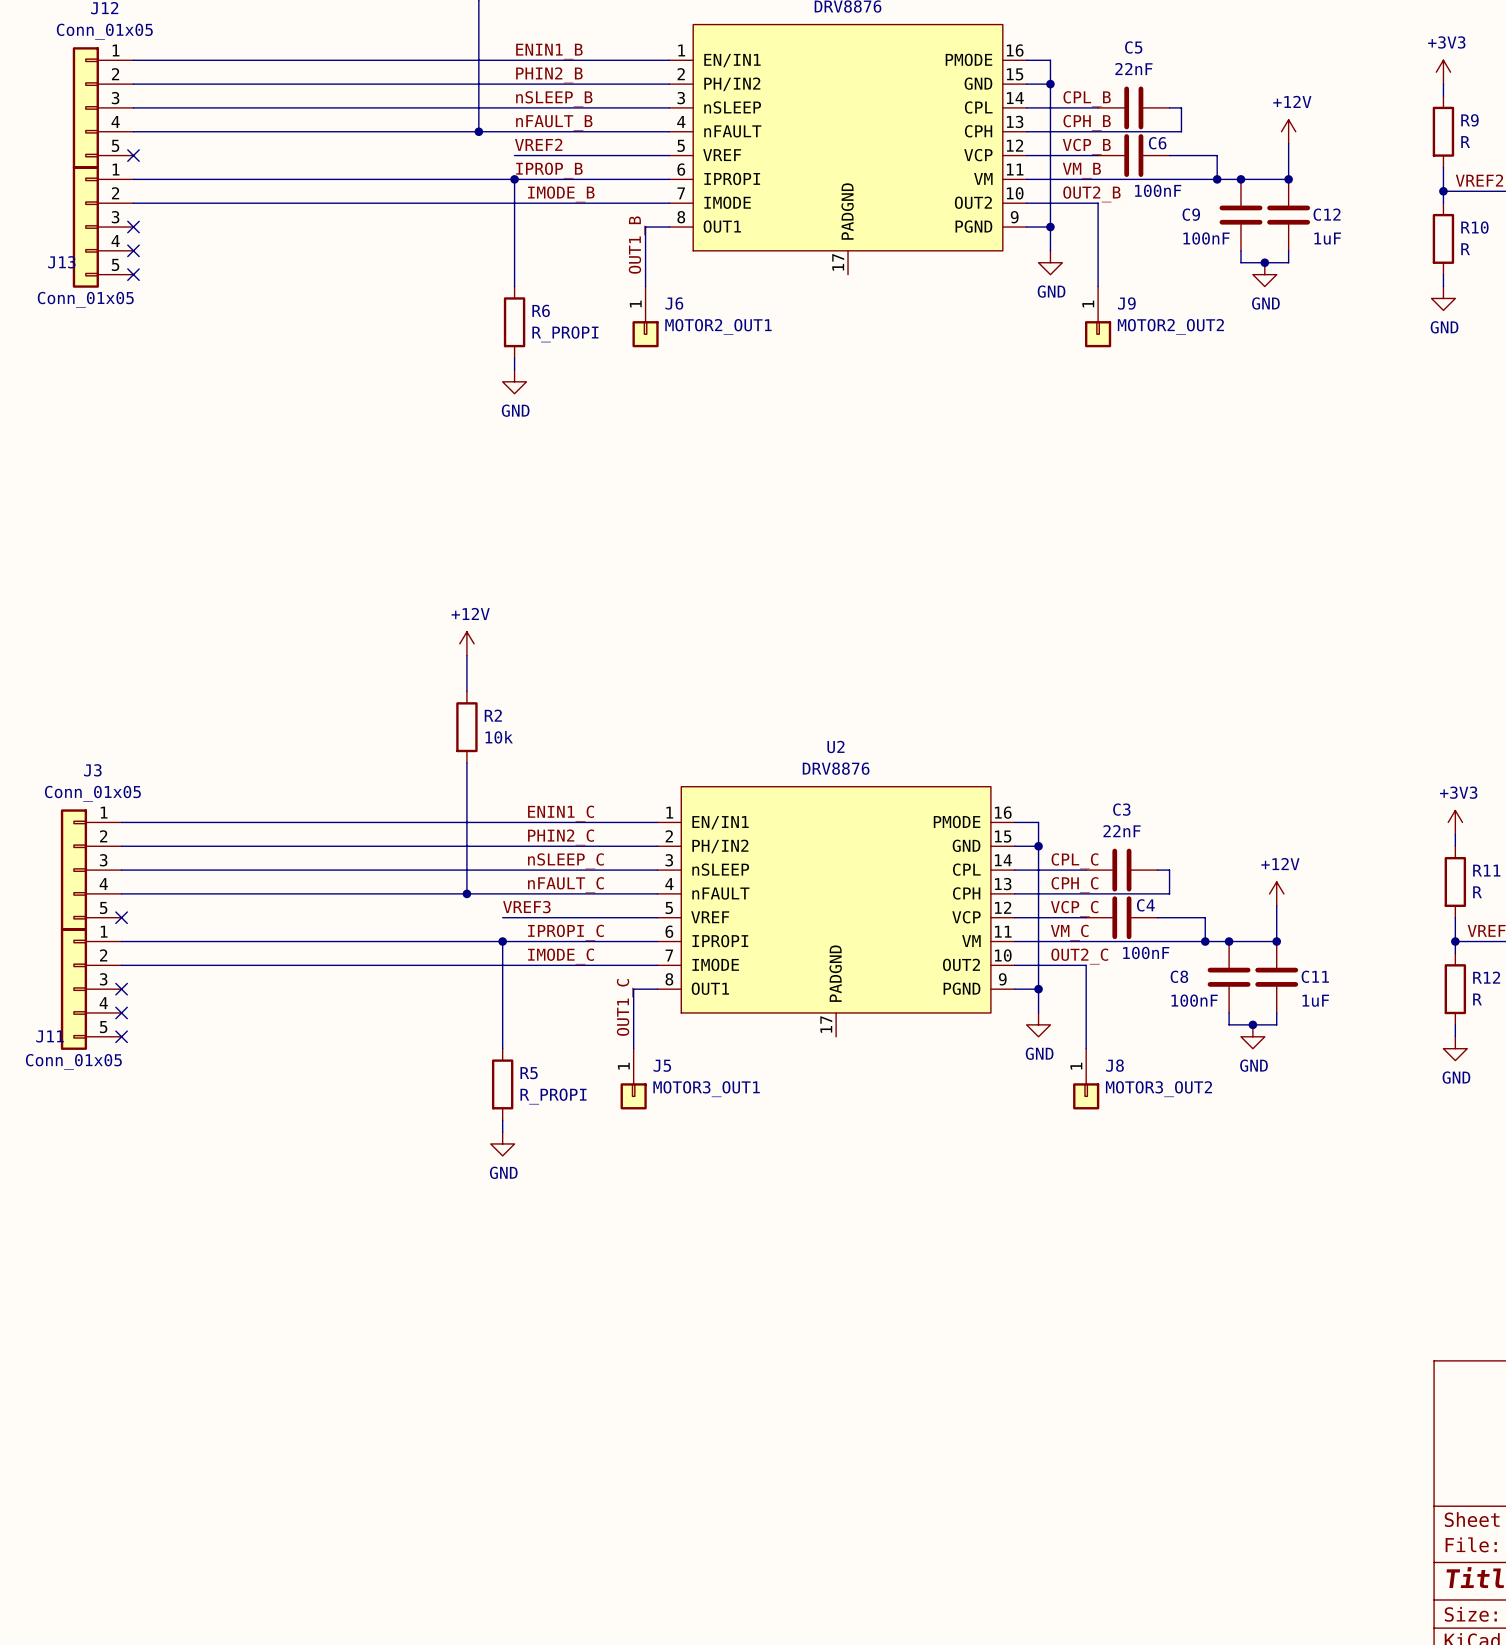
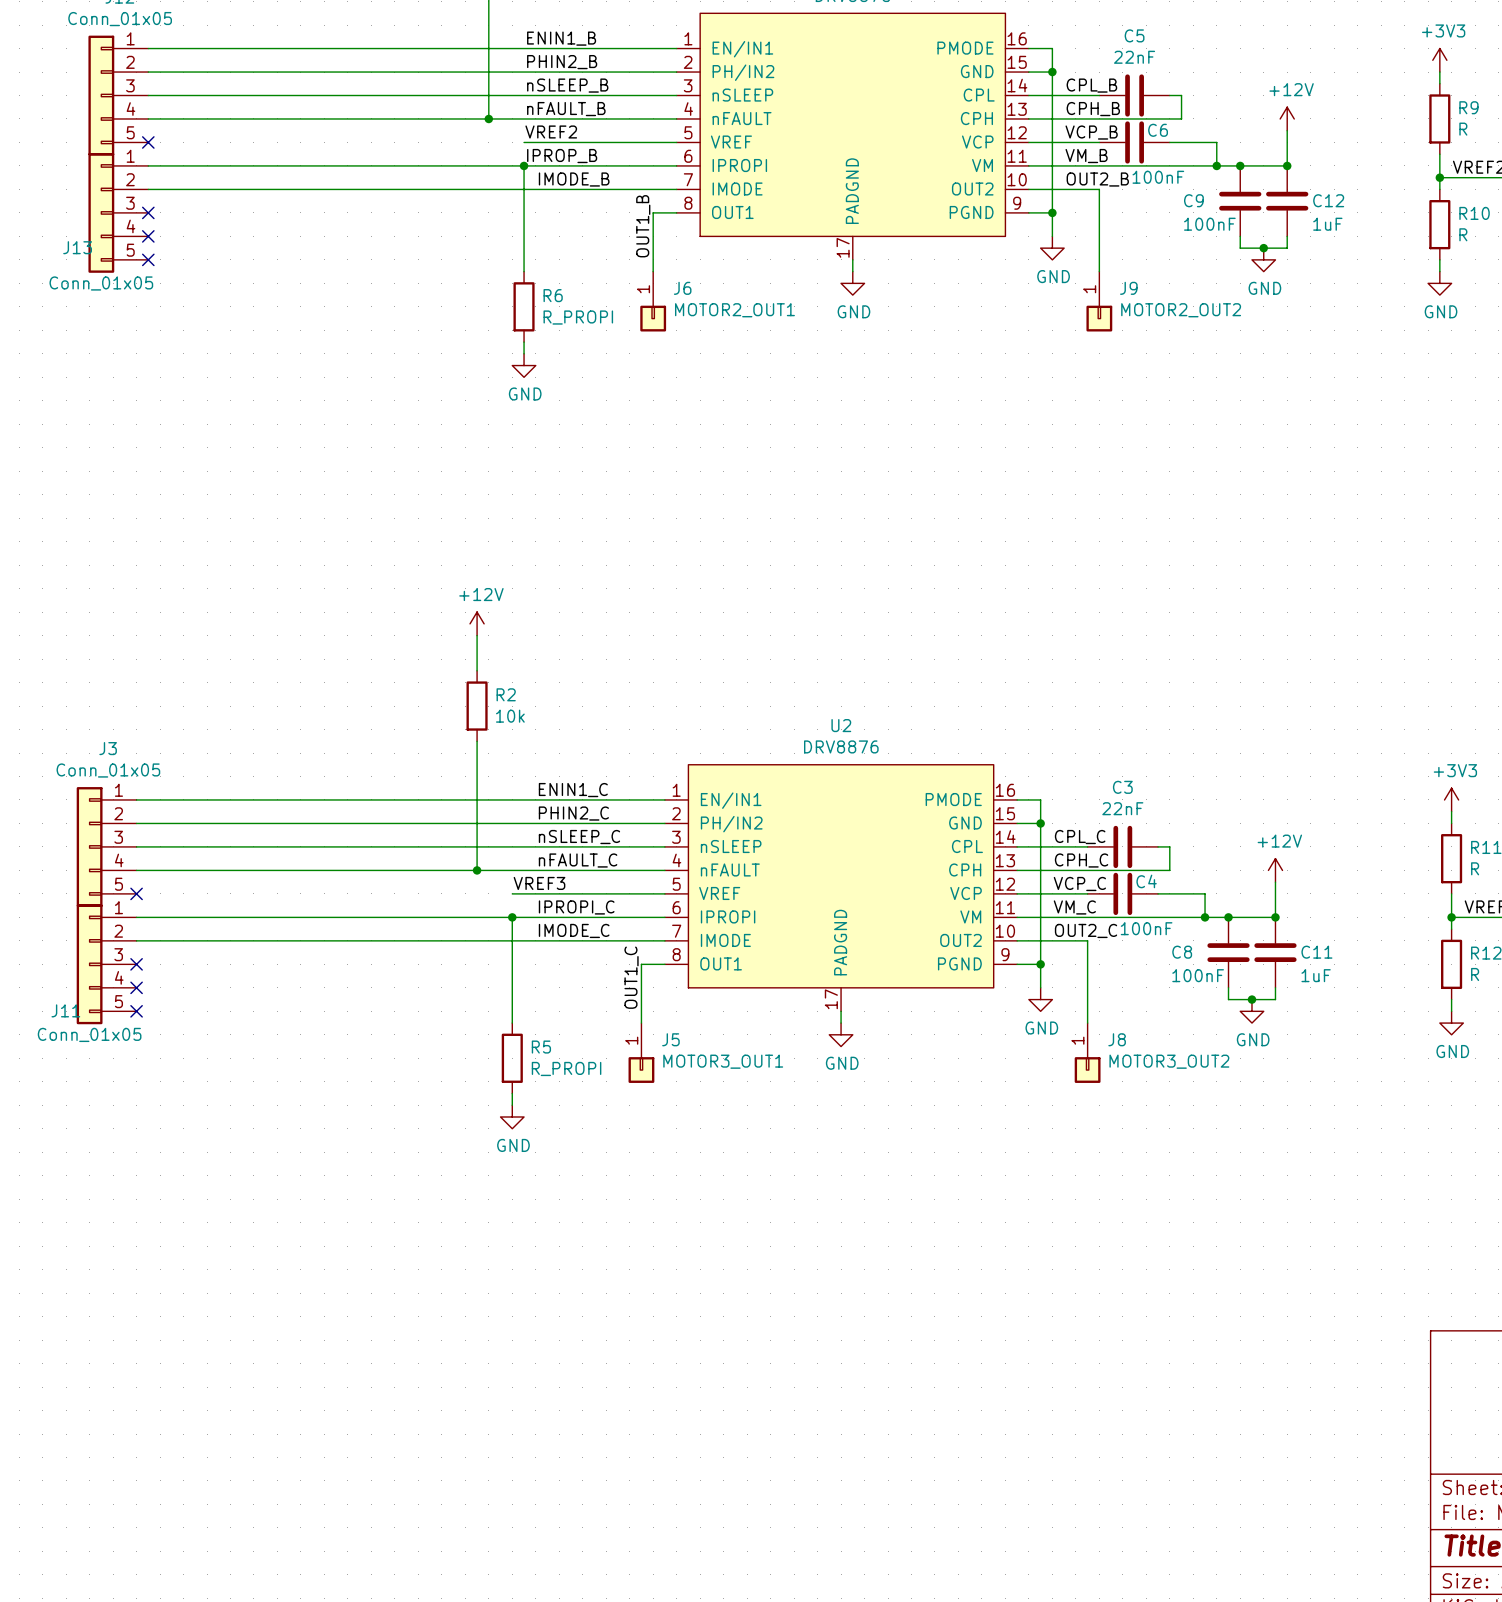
wire: none -> (852, 259) (852, 271)
power symbol: none -> GND (852, 283)
wire: none -> (841, 1011) (841, 1023)
power symbol: none -> GND (841, 1034)

